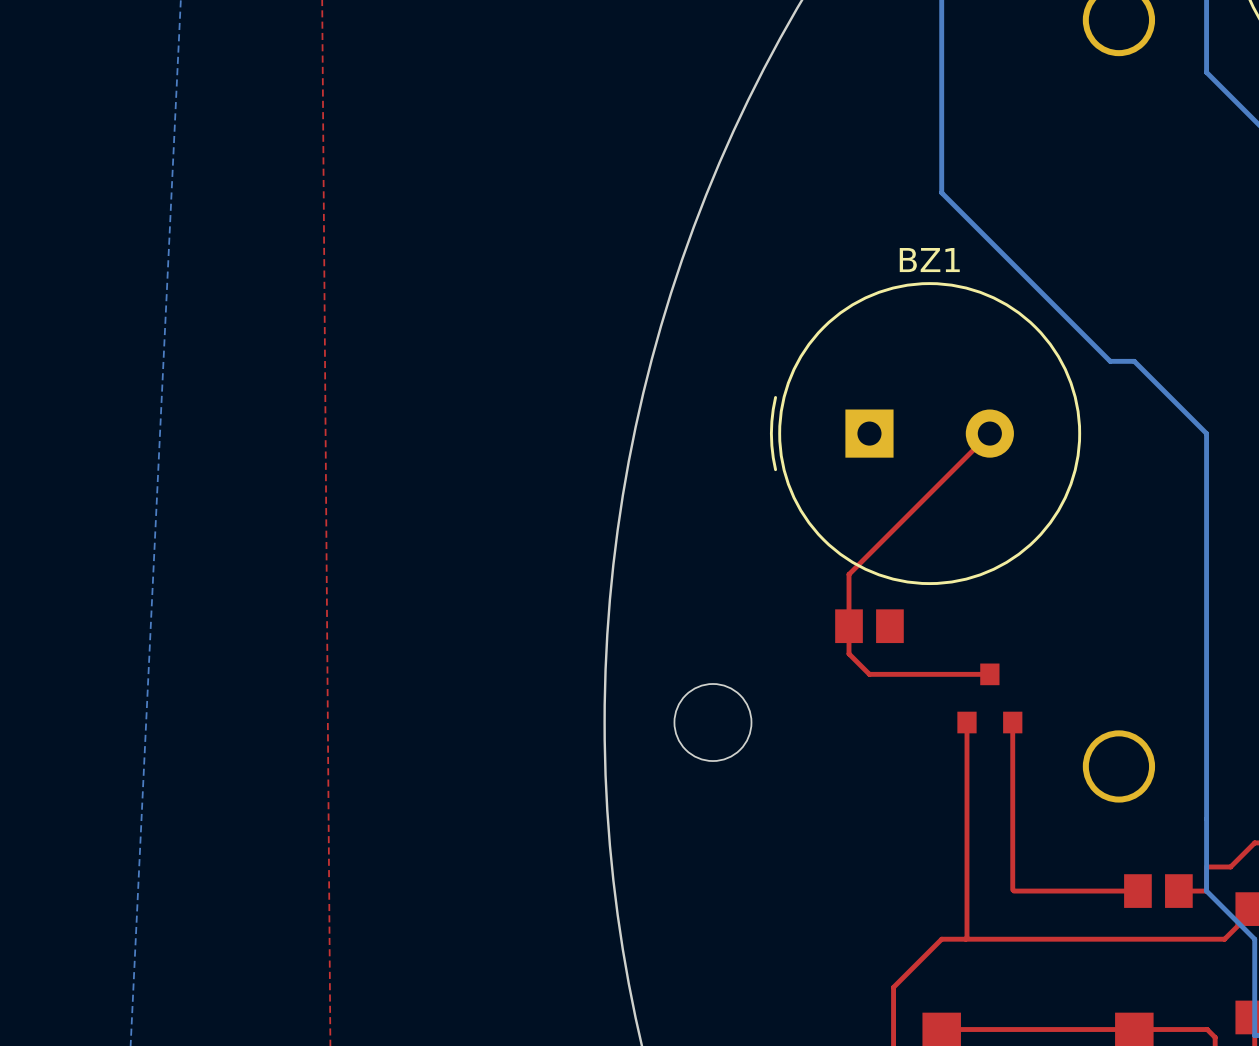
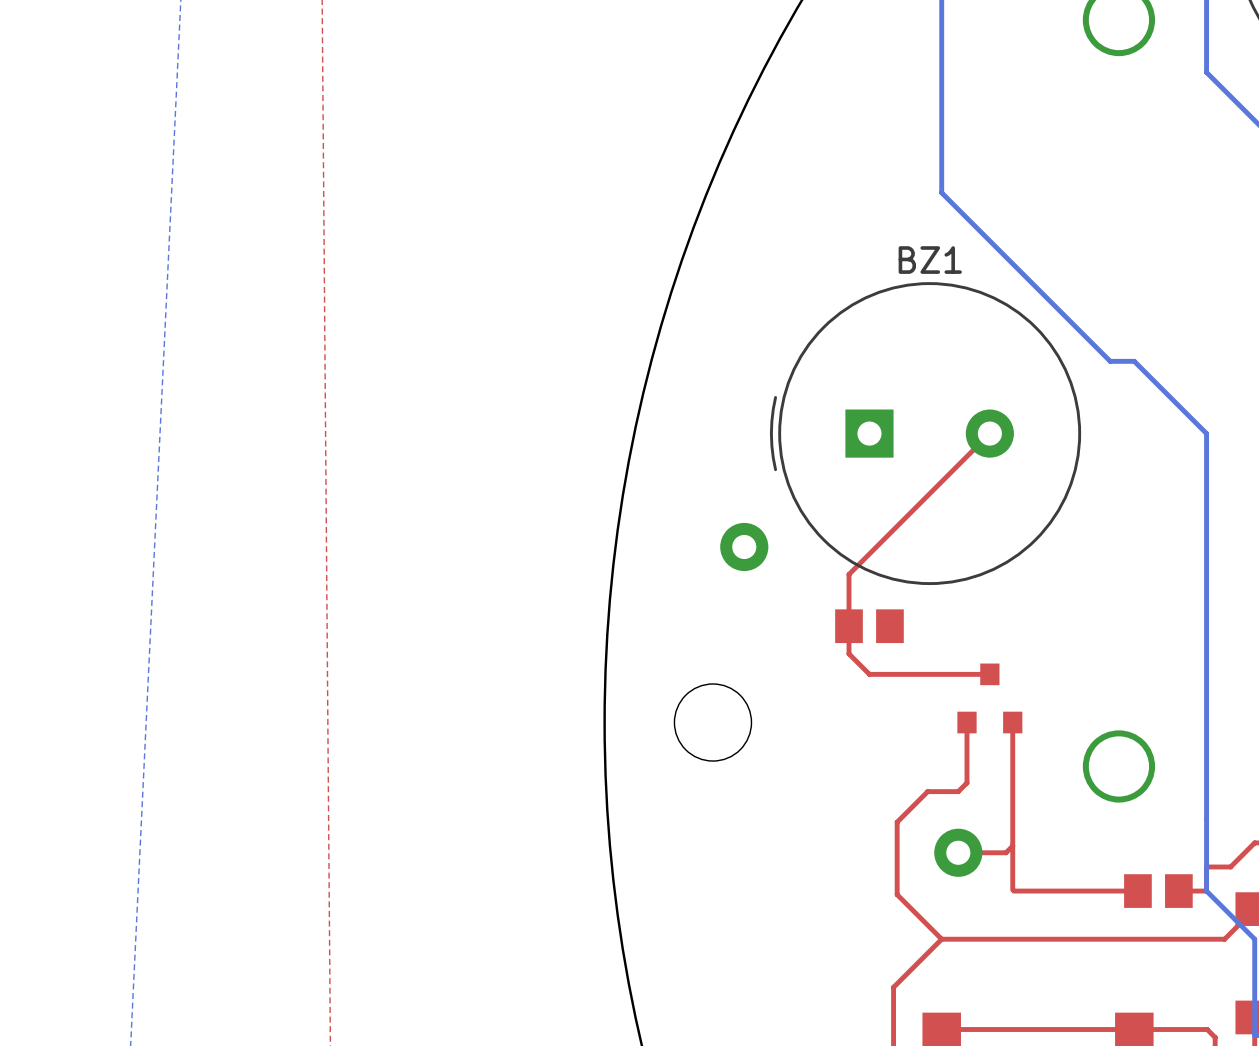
part: none -> (744, 546)
top track: (966, 782) (965, 939) -> (966, 782) (958, 791) (927, 791) (897, 822) (897, 894) (941, 939)
top track: none -> (1012, 846) (1005, 852) (958, 852)
part: none -> (958, 852)

